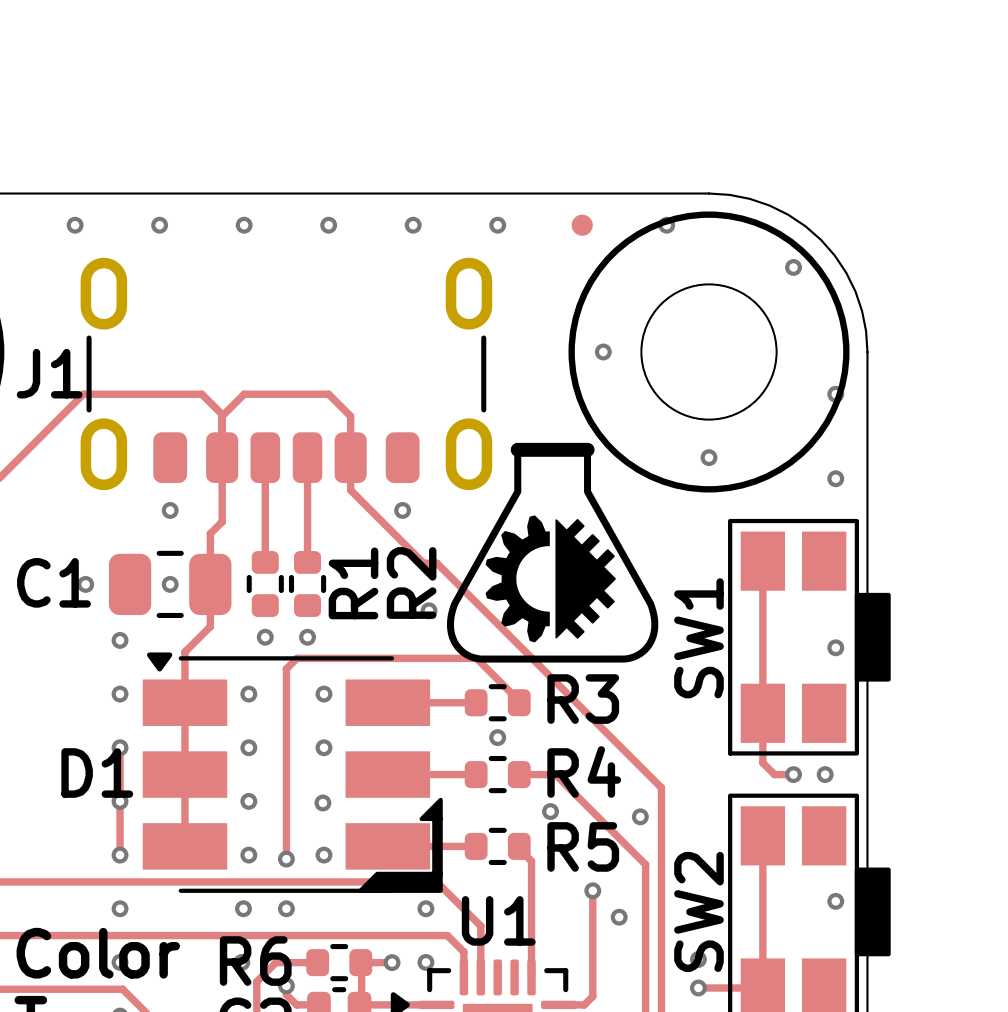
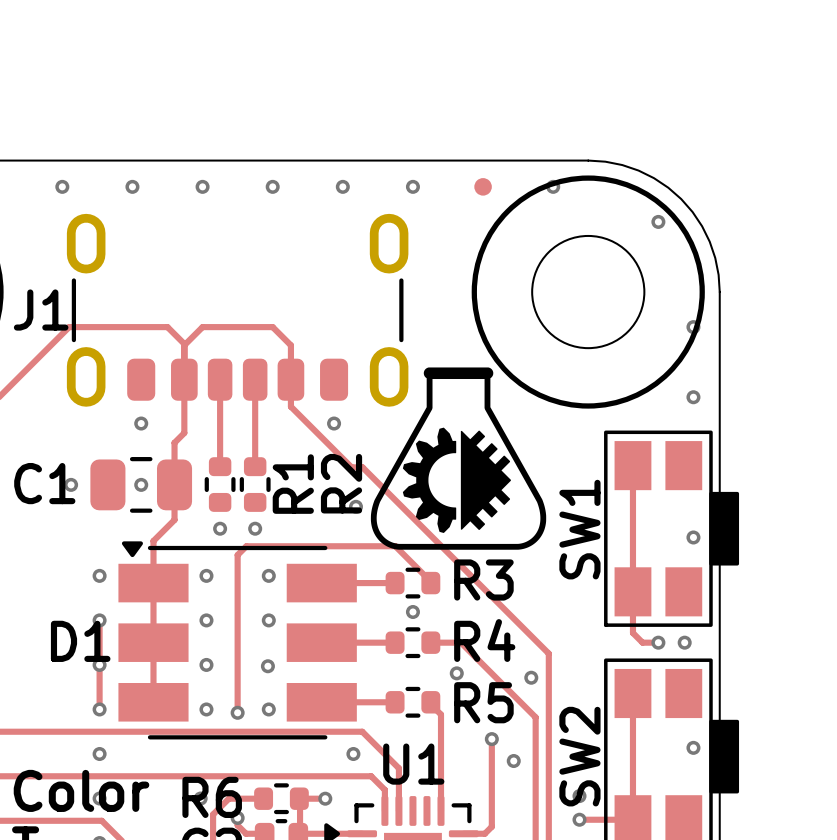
via: (603, 351) -> none
via: (709, 457) -> none
via: (120, 640) -> none
D1 footprint: [142, 652, 443, 893] -> [118, 541, 357, 740]
via: (243, 908) -> none
via: (286, 908) -> none
via: (425, 962) -> none

